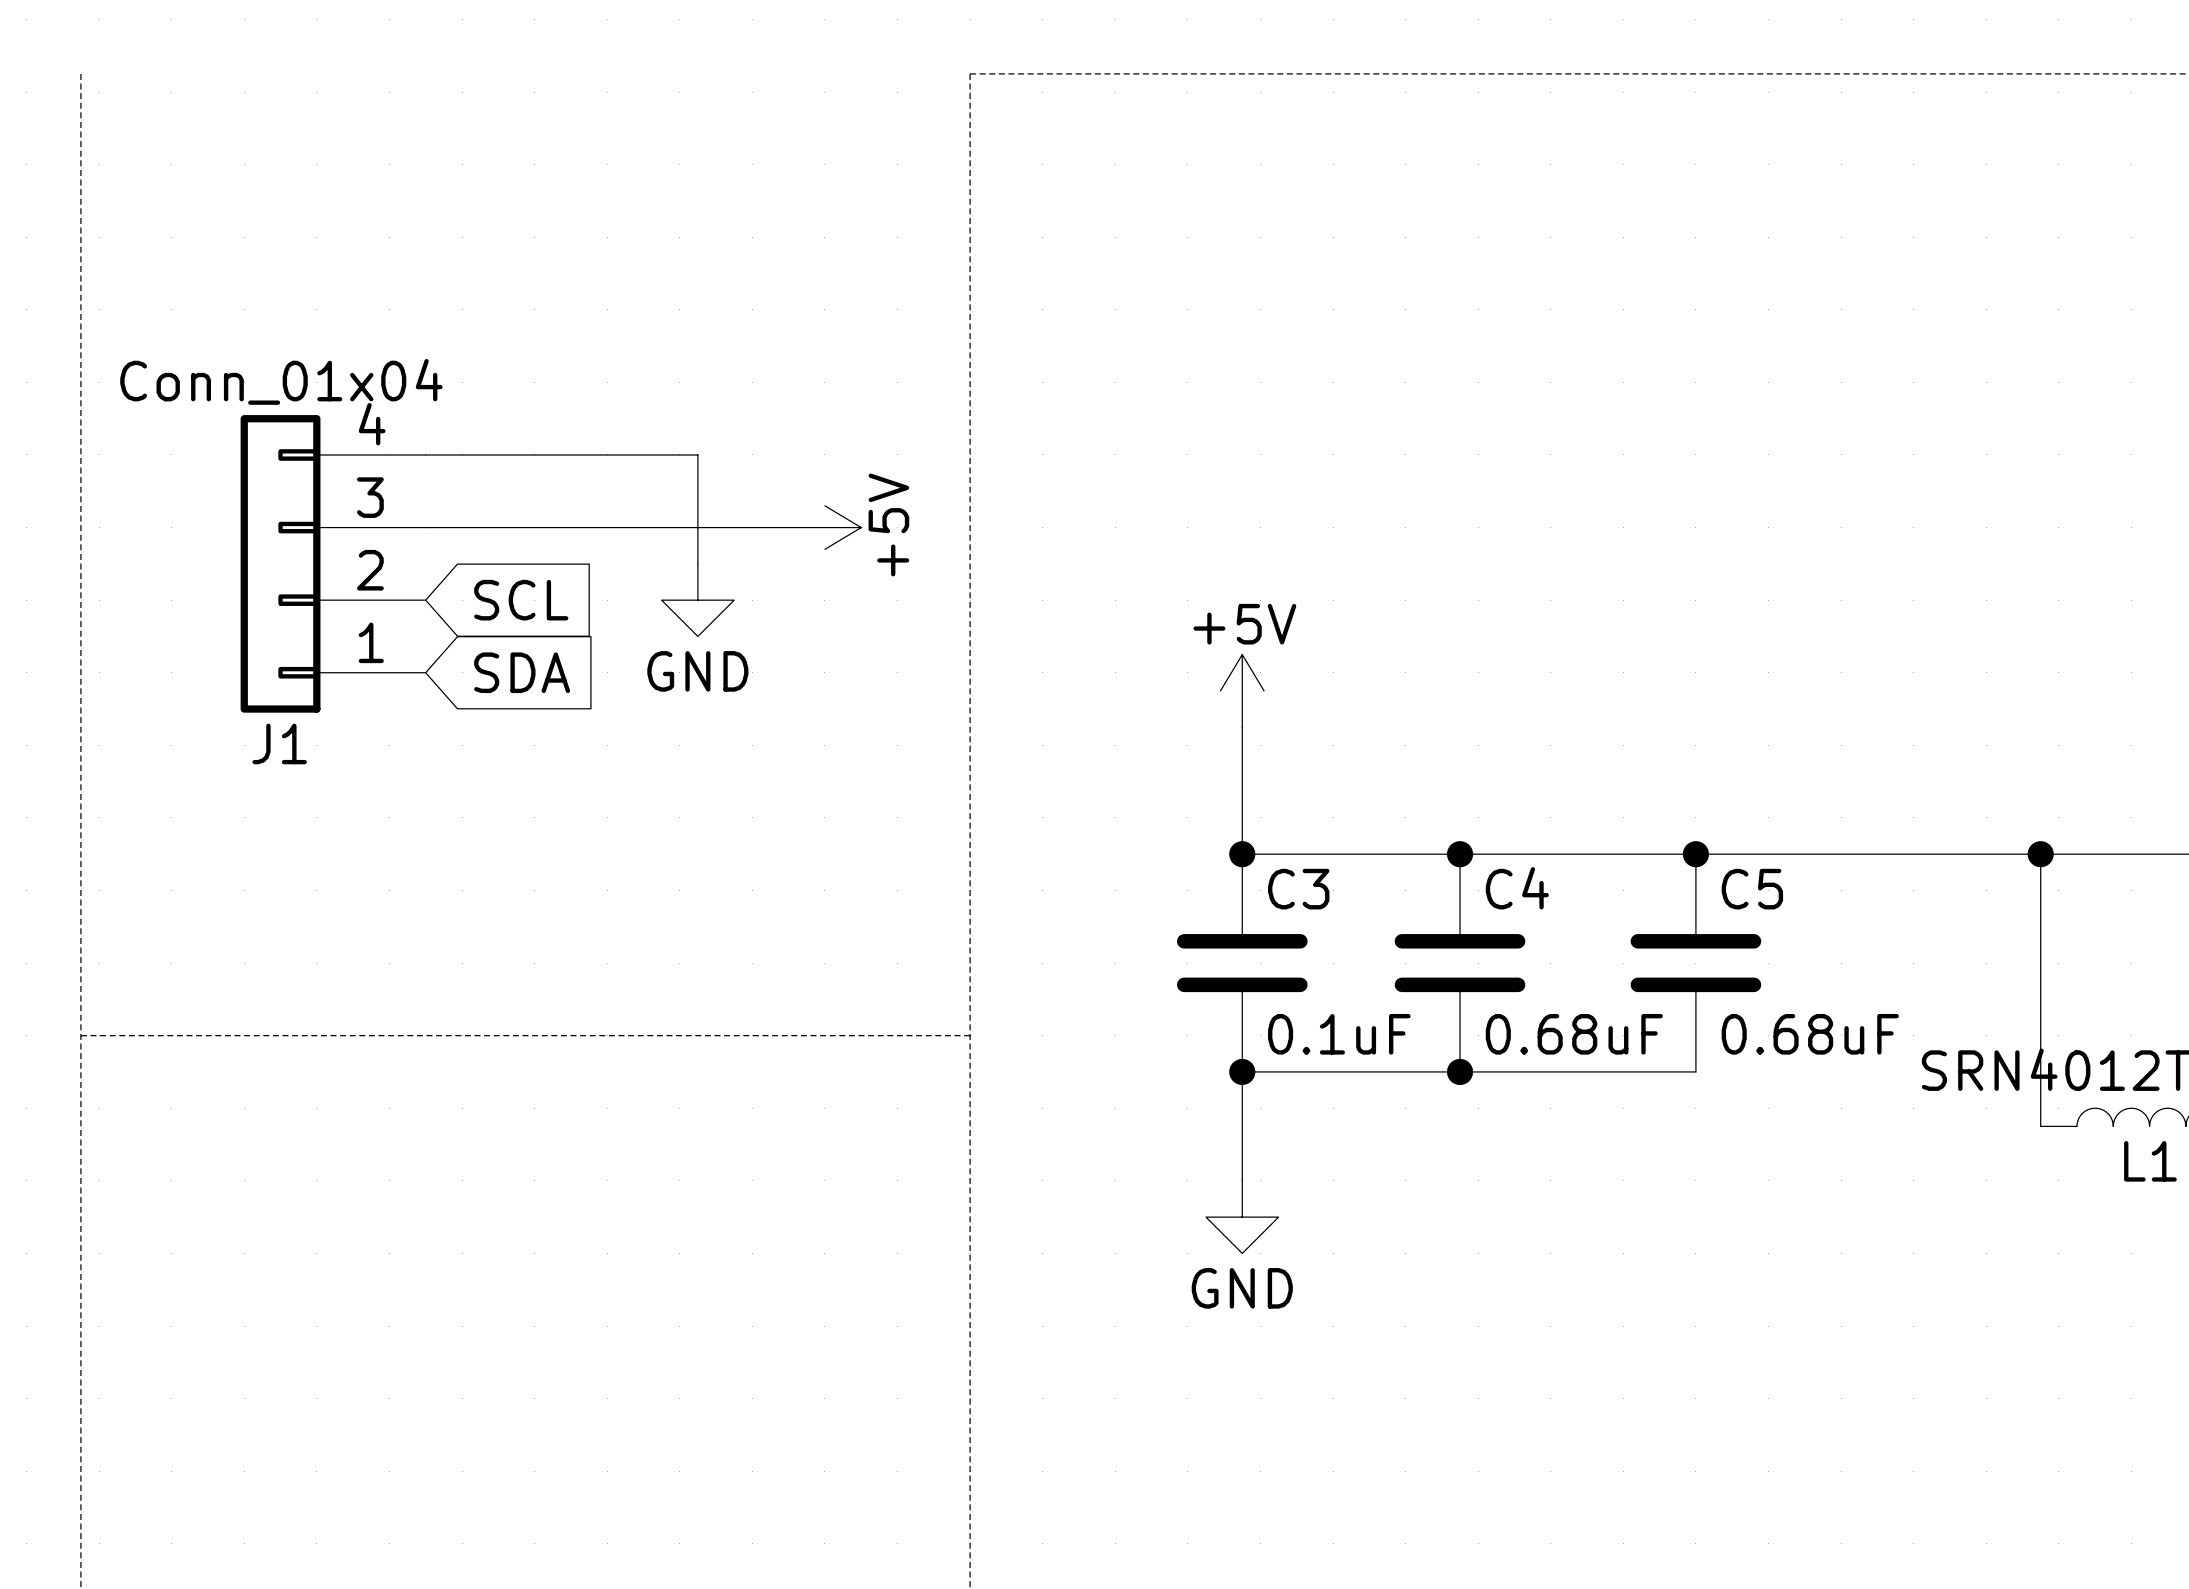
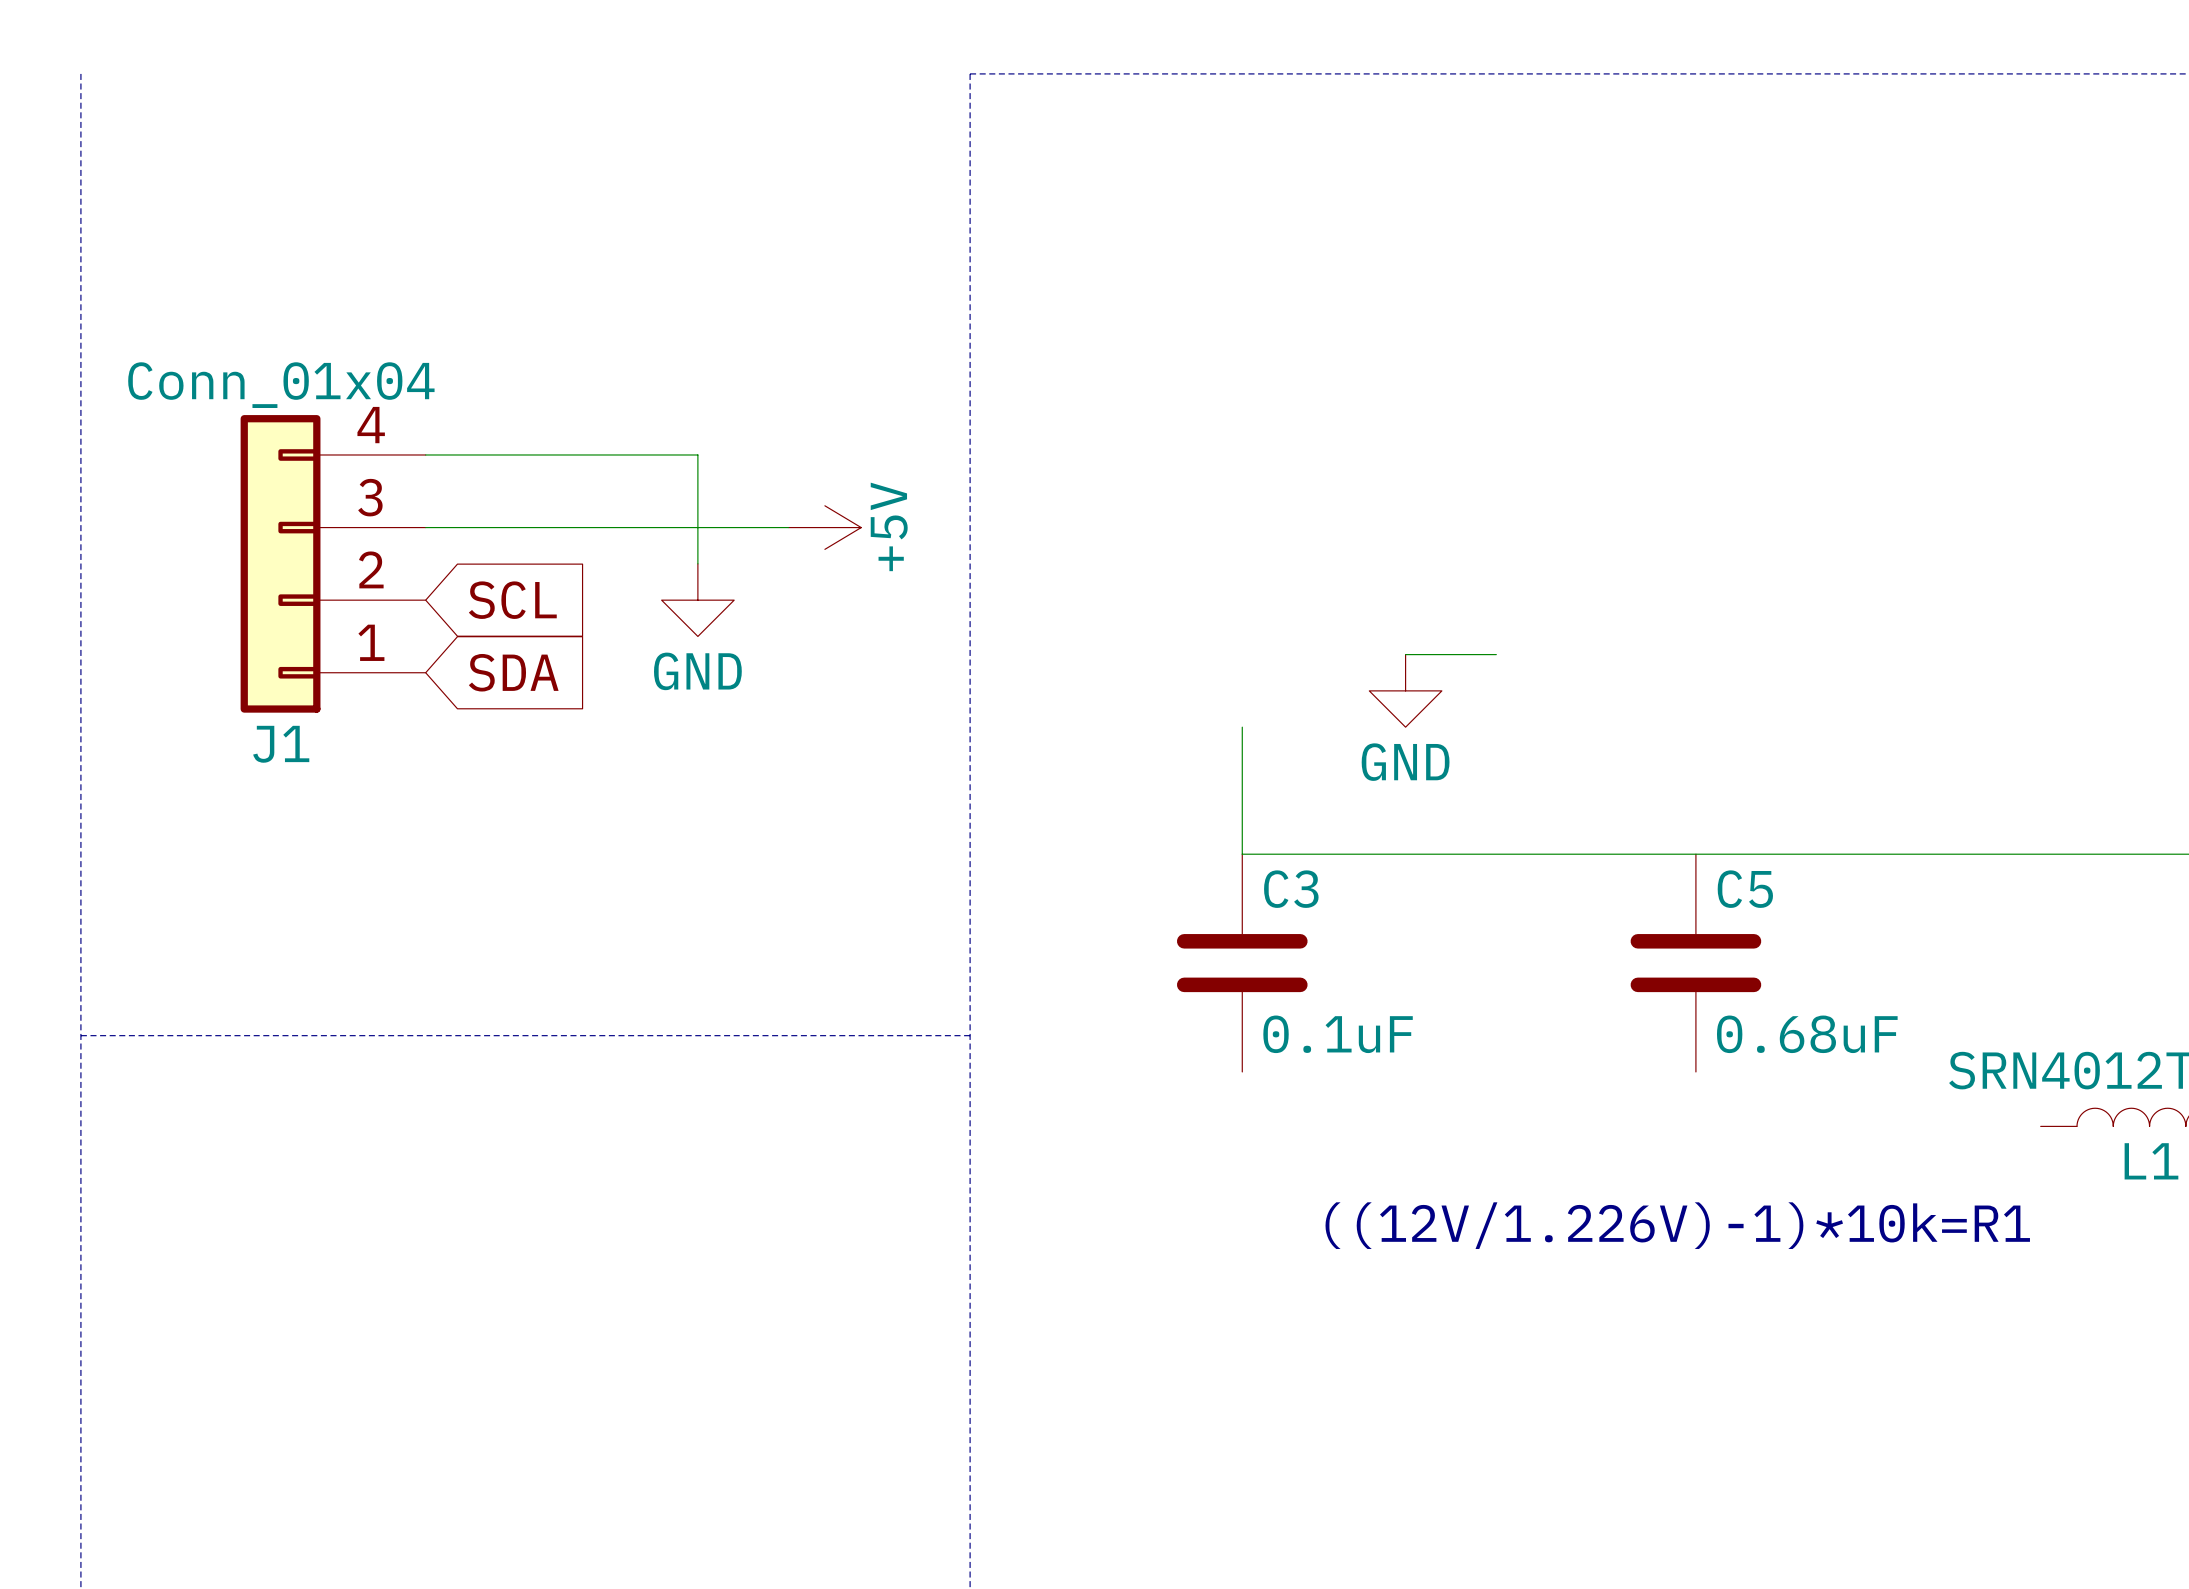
wire: none -> (1405, 654) (1496, 654)
power symbol: +5V (1242, 690) -> none
power symbol: none -> GND (1405, 690)
junction: (1242, 854) -> none
junction: (1460, 854) -> none
junction: (1695, 854) -> none
wire: (2040, 854) (2040, 1126) -> none
junction: (2040, 854) -> none
C4: 0.68uF (1460, 963) -> none
junction: (1242, 1071) -> none
junction: (1460, 1071) -> none
wire: (1695, 1071) (1242, 1071) (1242, 1180) -> none
power symbol: GND (1242, 1217) -> none
text: none -> ((12V/1.226V)-1)*10k=R1 (1677, 1225)

